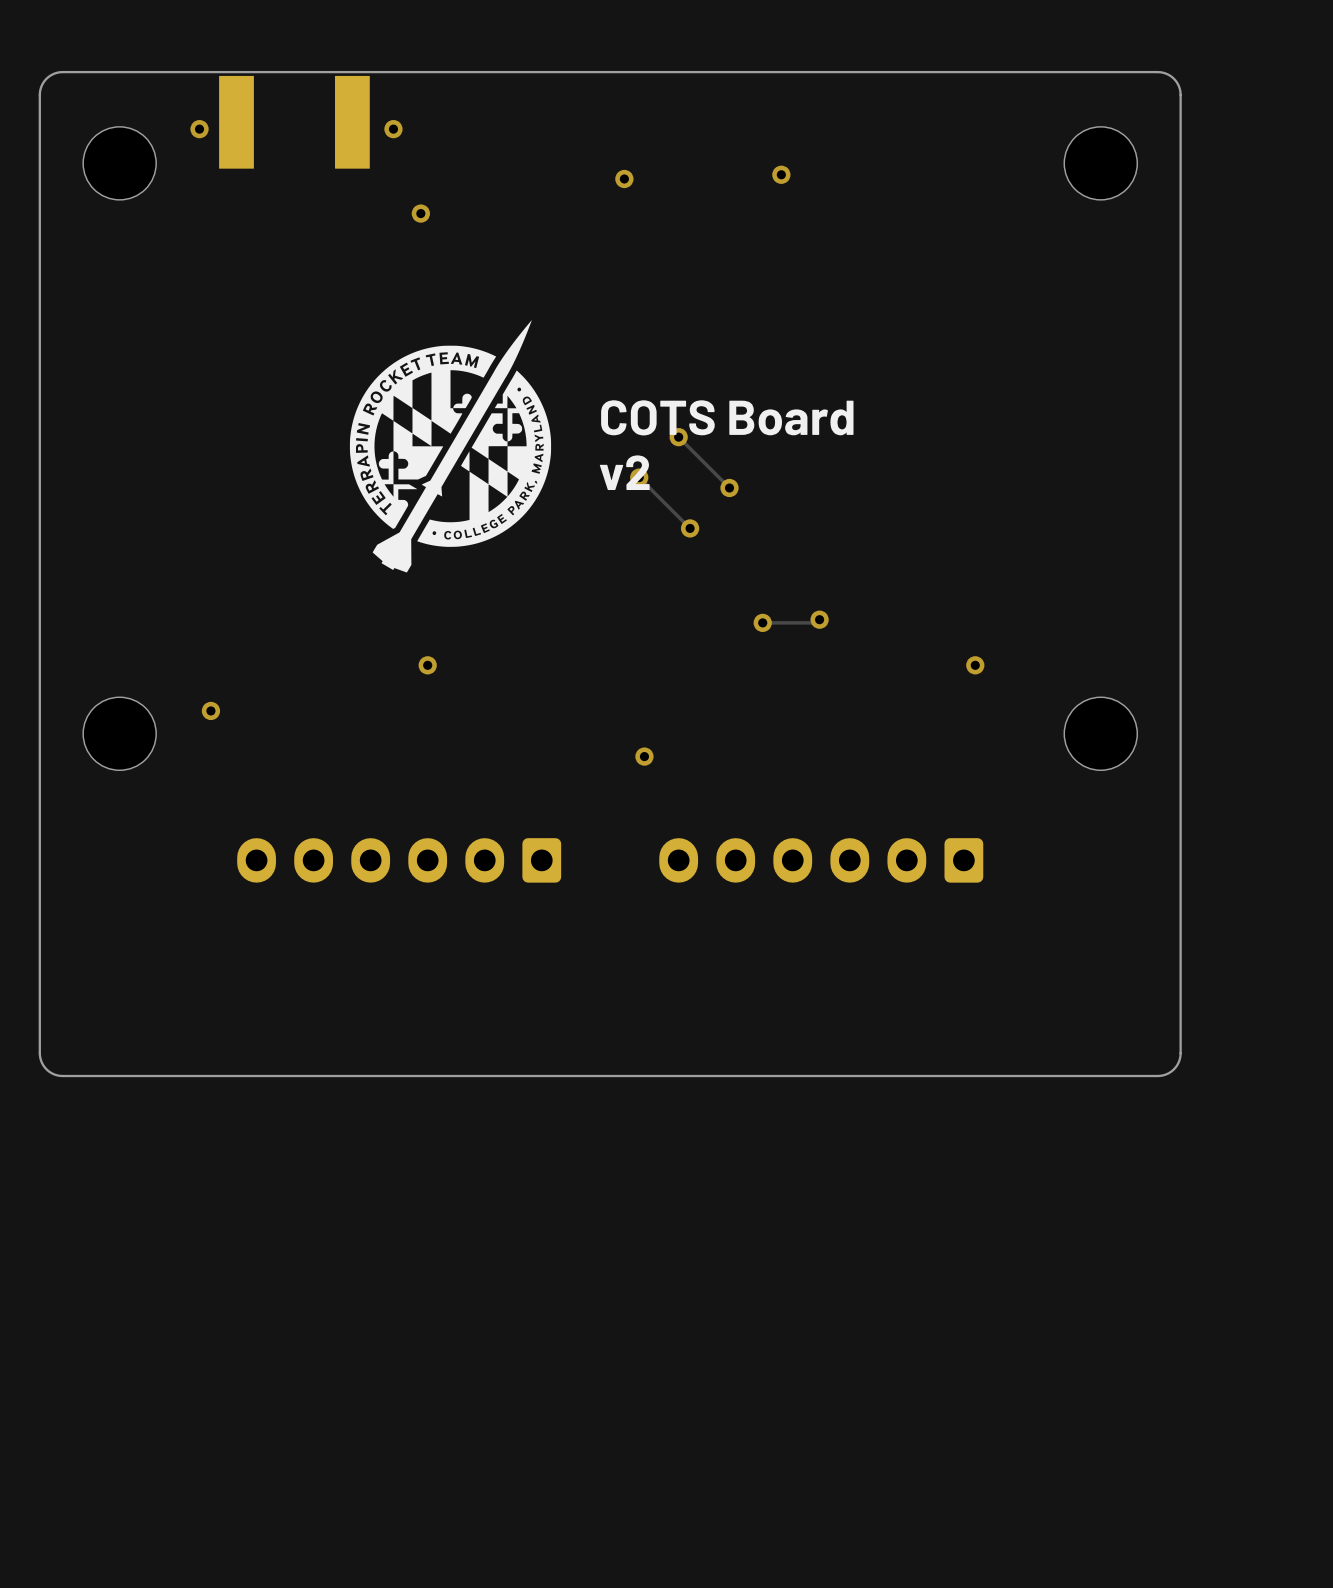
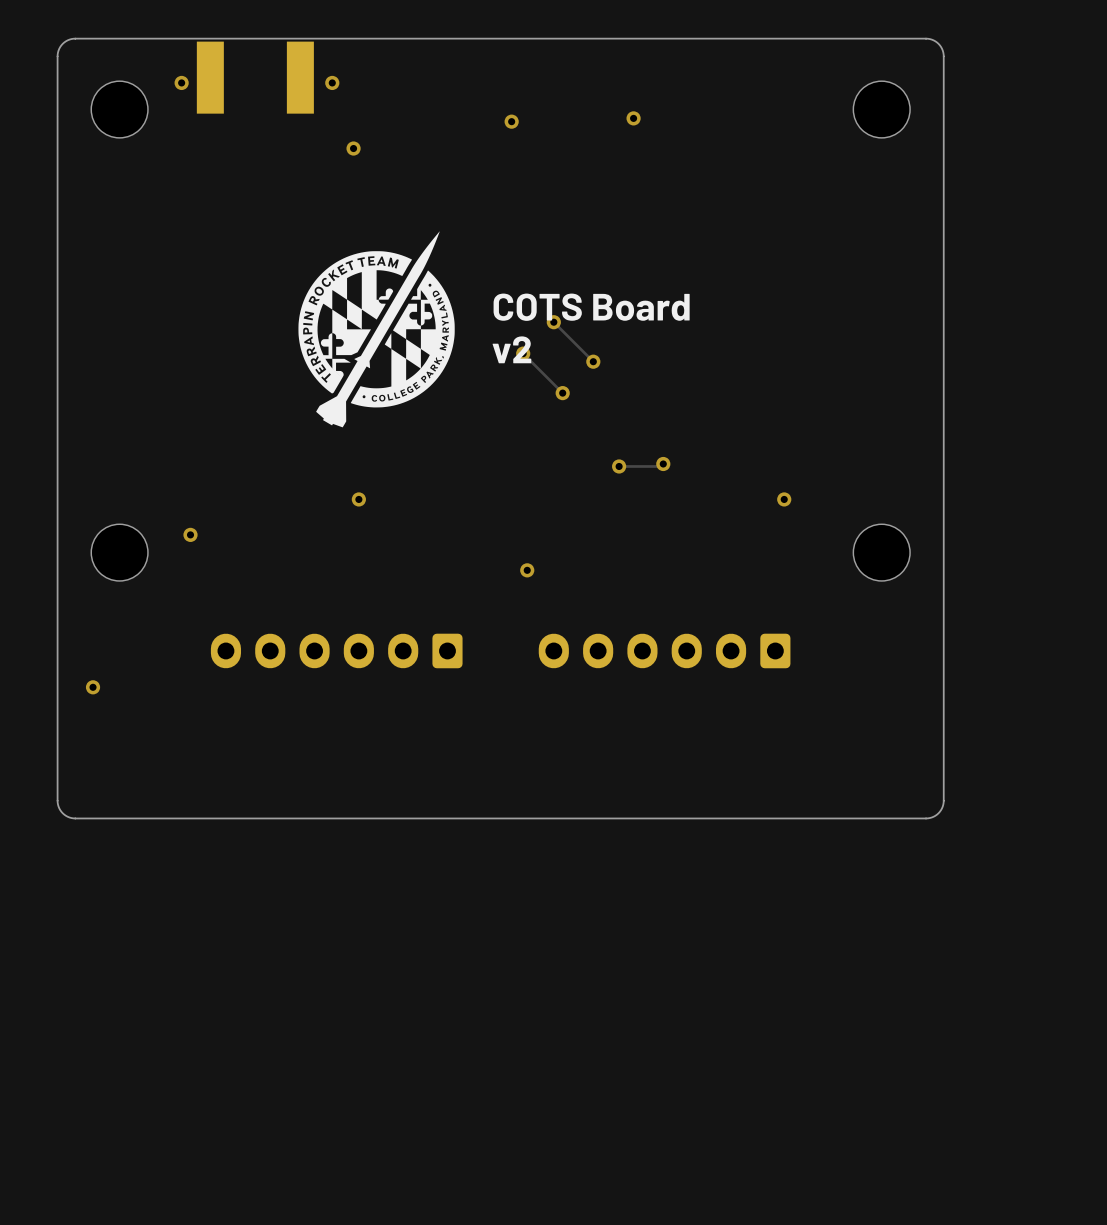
via: none -> (93, 687)

